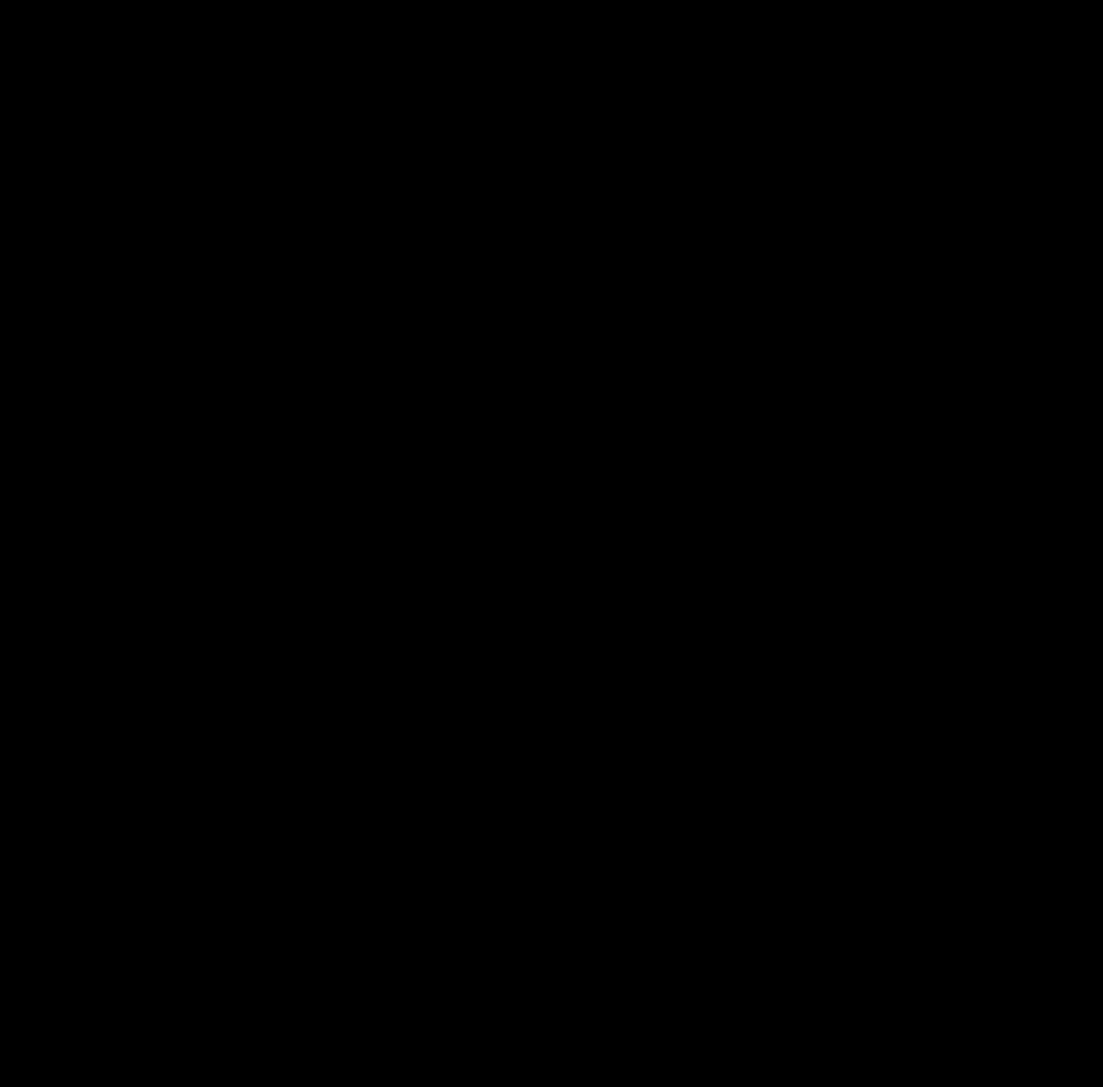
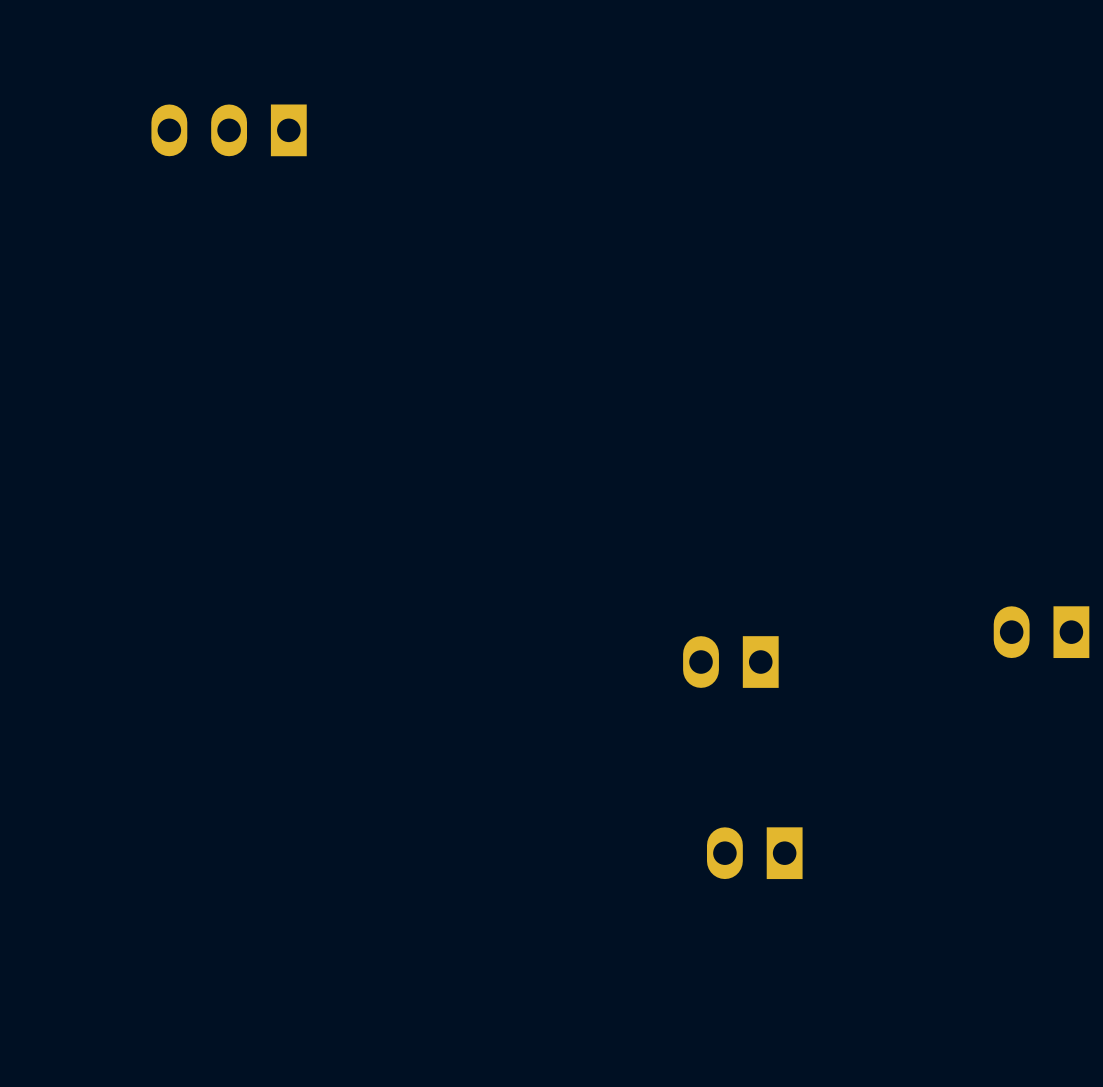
part: none -> (229, 130)
part: none -> (1041, 632)
part: none -> (730, 662)
part: none -> (754, 853)

